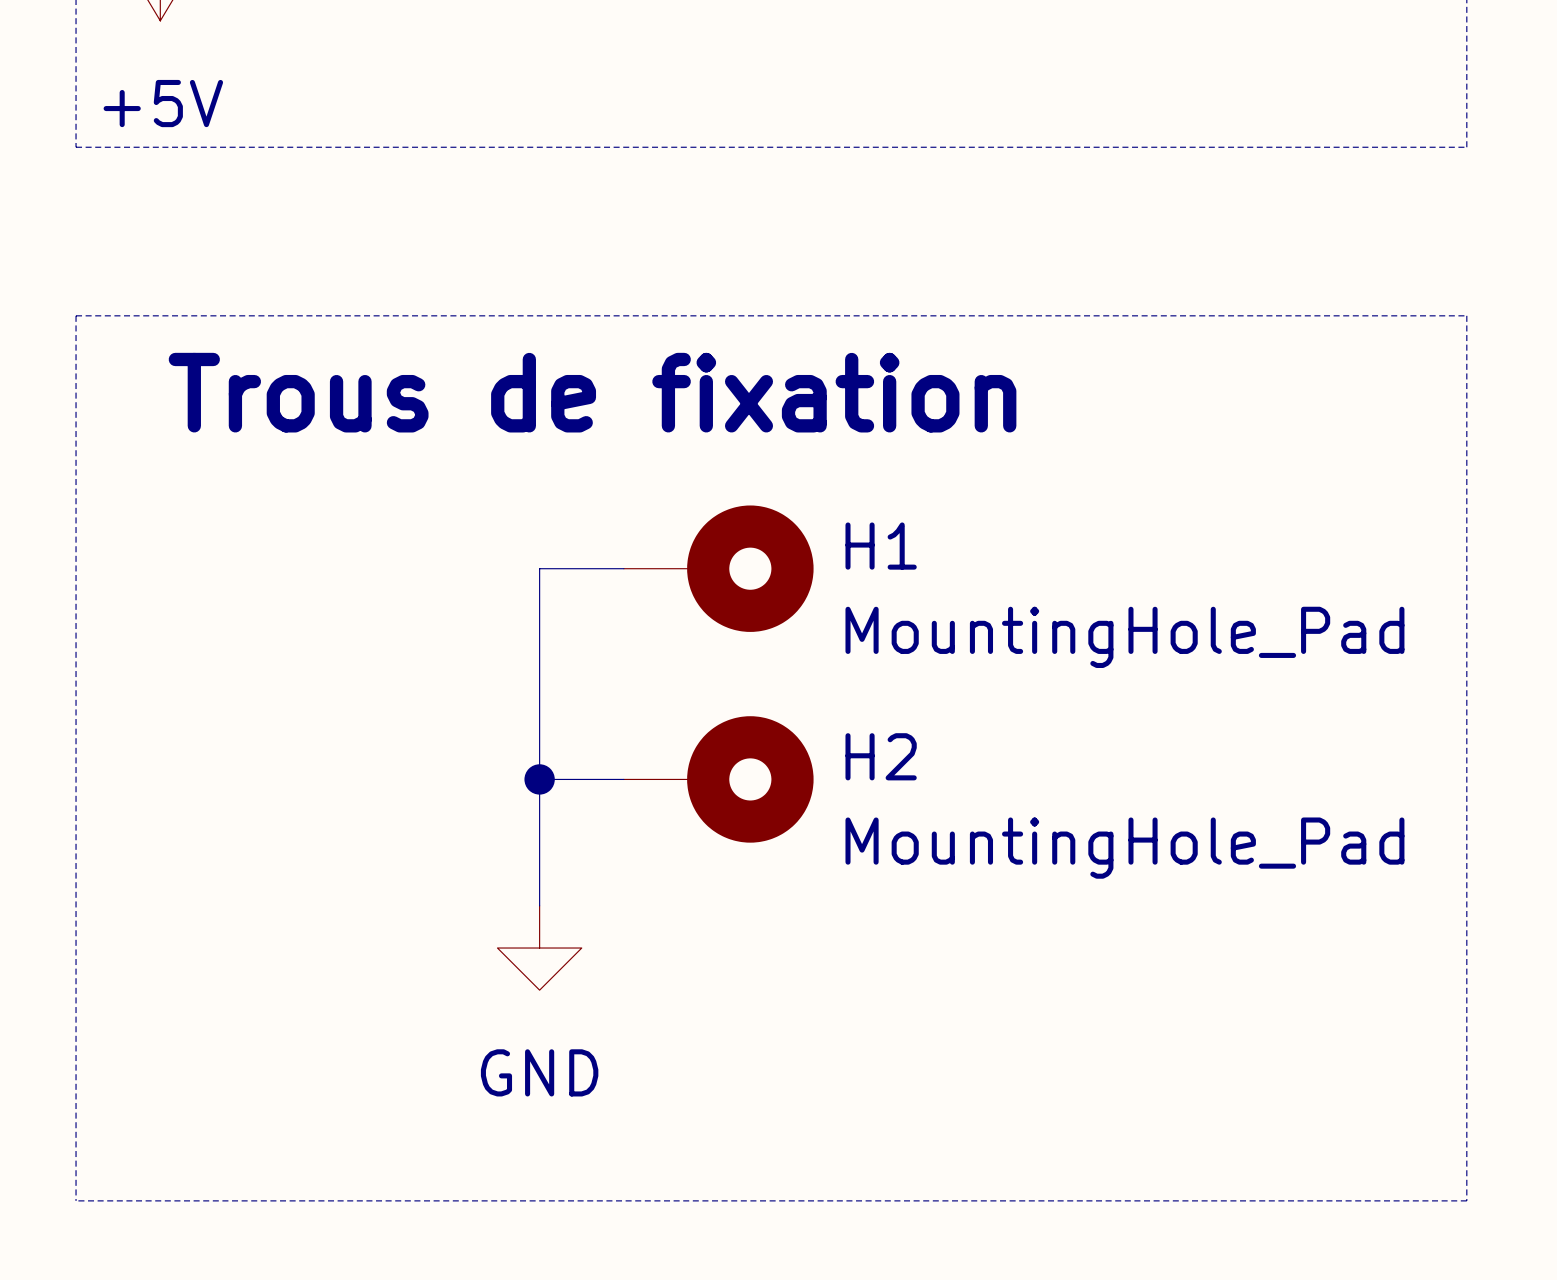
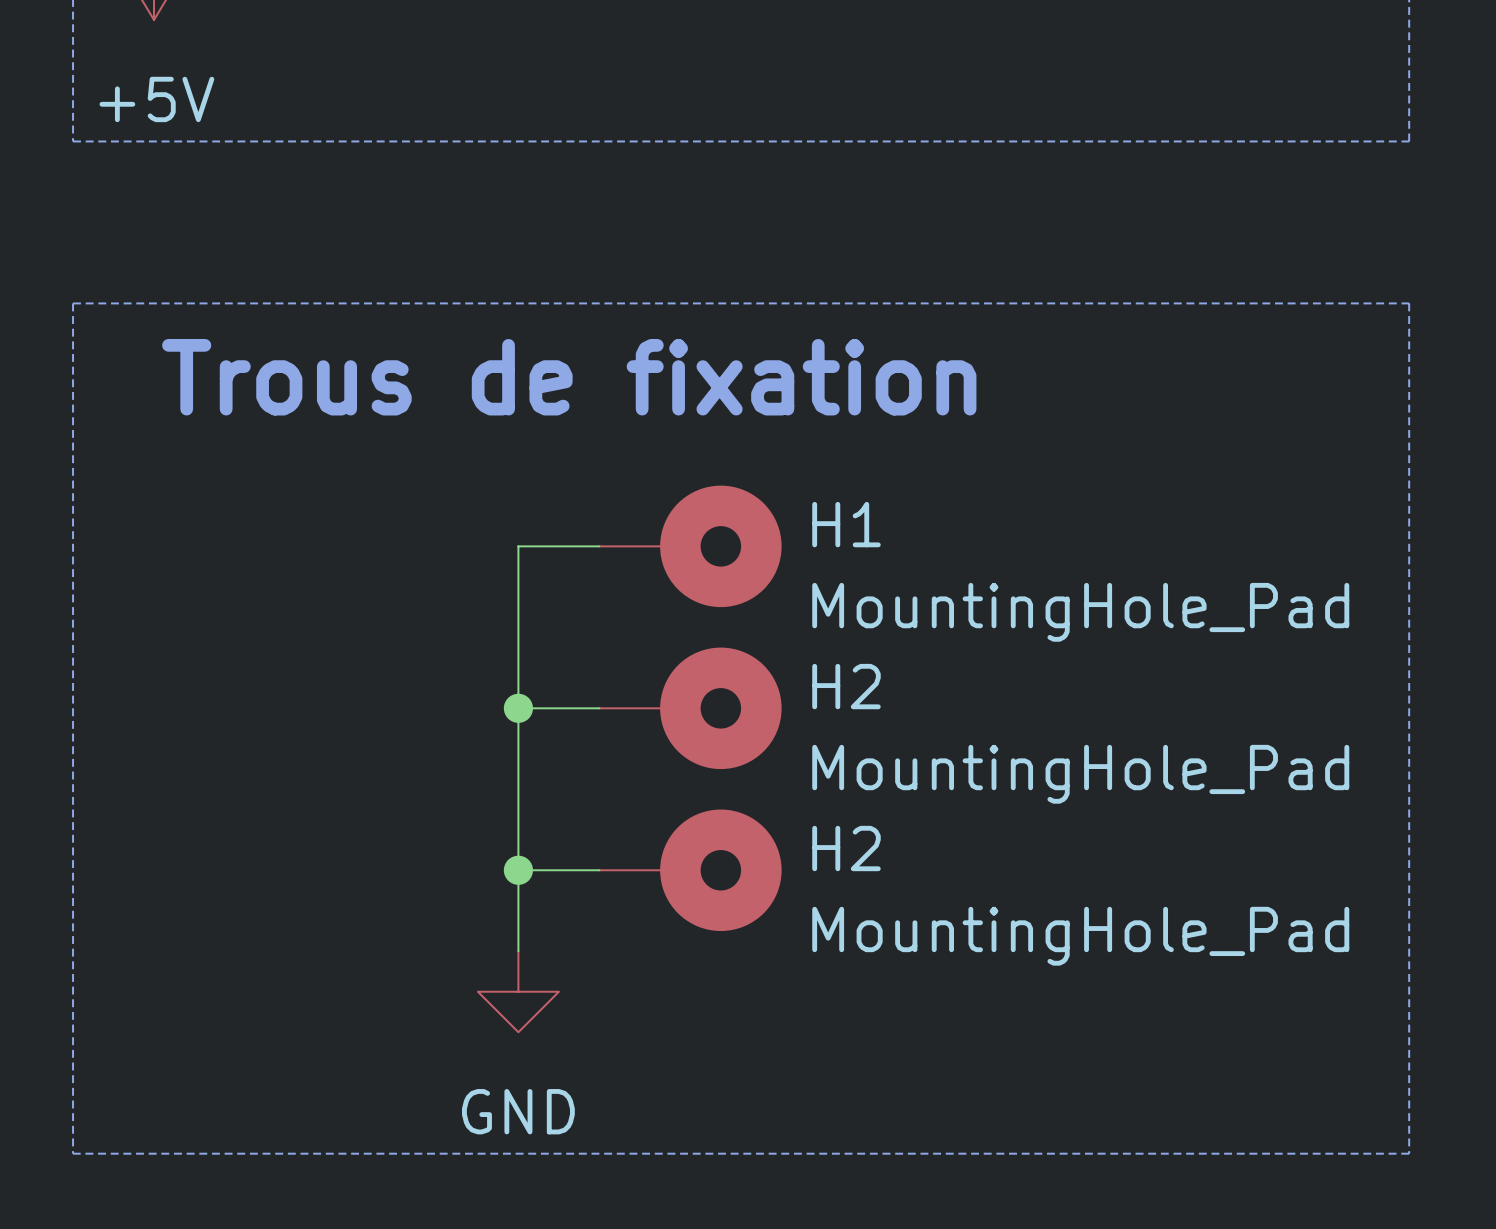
wire: (539, 779) (623, 779) -> (518, 708) (599, 708)
junction position: (539, 779) -> (518, 708)
H2 position: (718, 779) -> (690, 708)
junction: none -> (518, 870)
wire: none -> (599, 870) (518, 870) (518, 951)
H2: none -> MountingHole_Pad (690, 870)
power symbol position: GND (539, 948) -> GND (518, 991)

